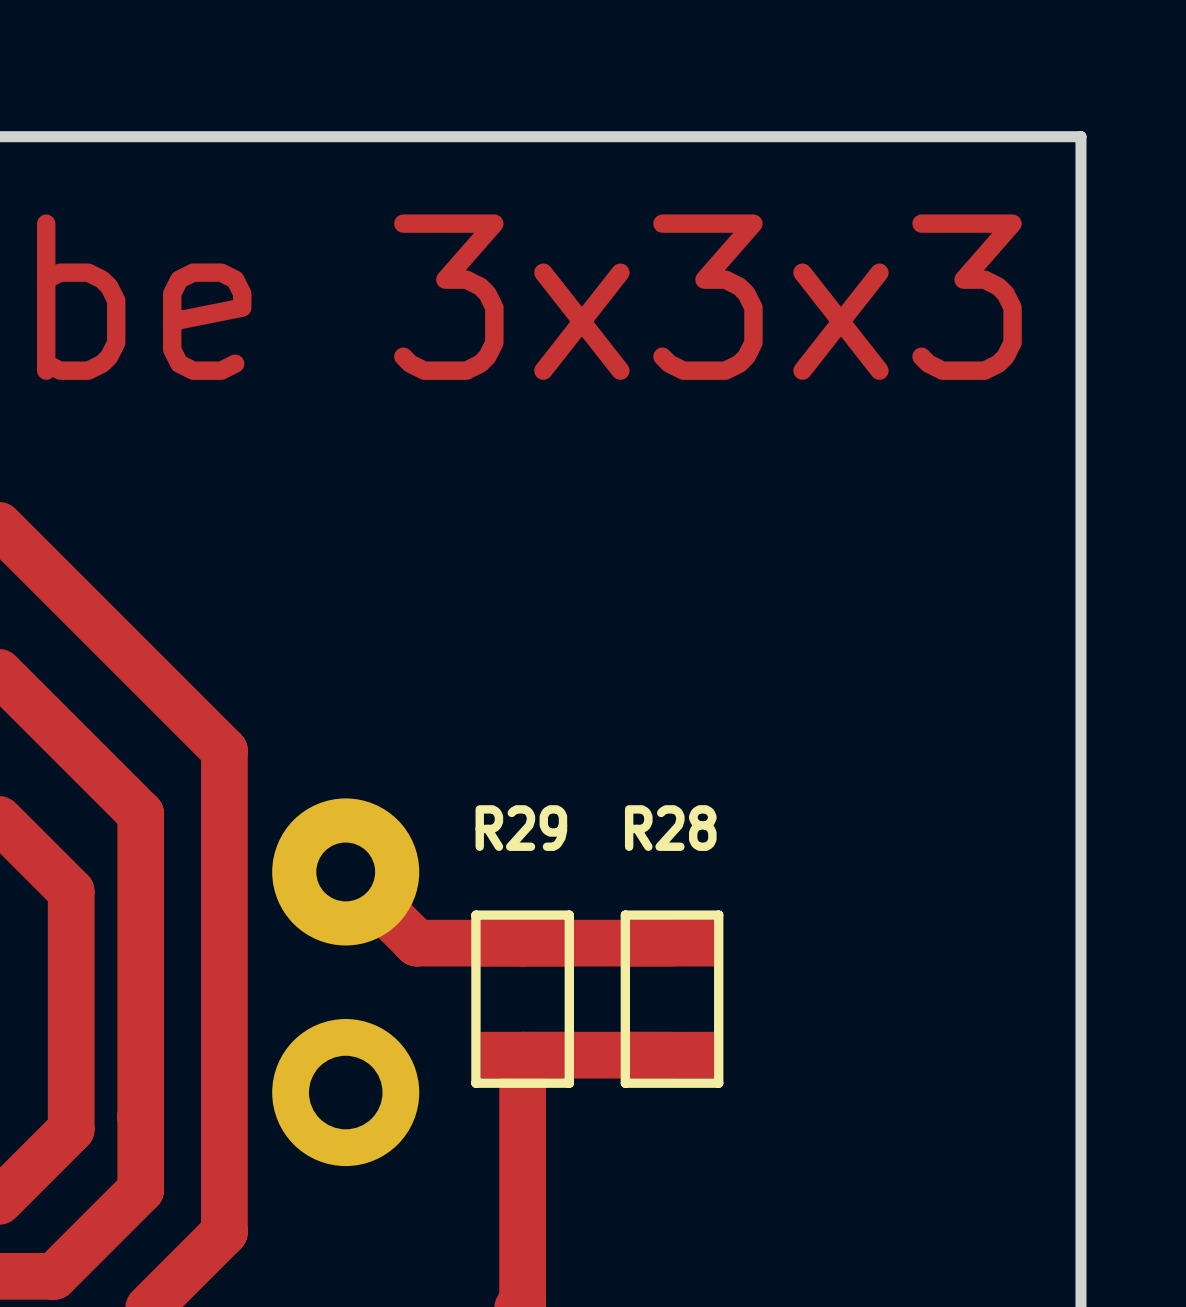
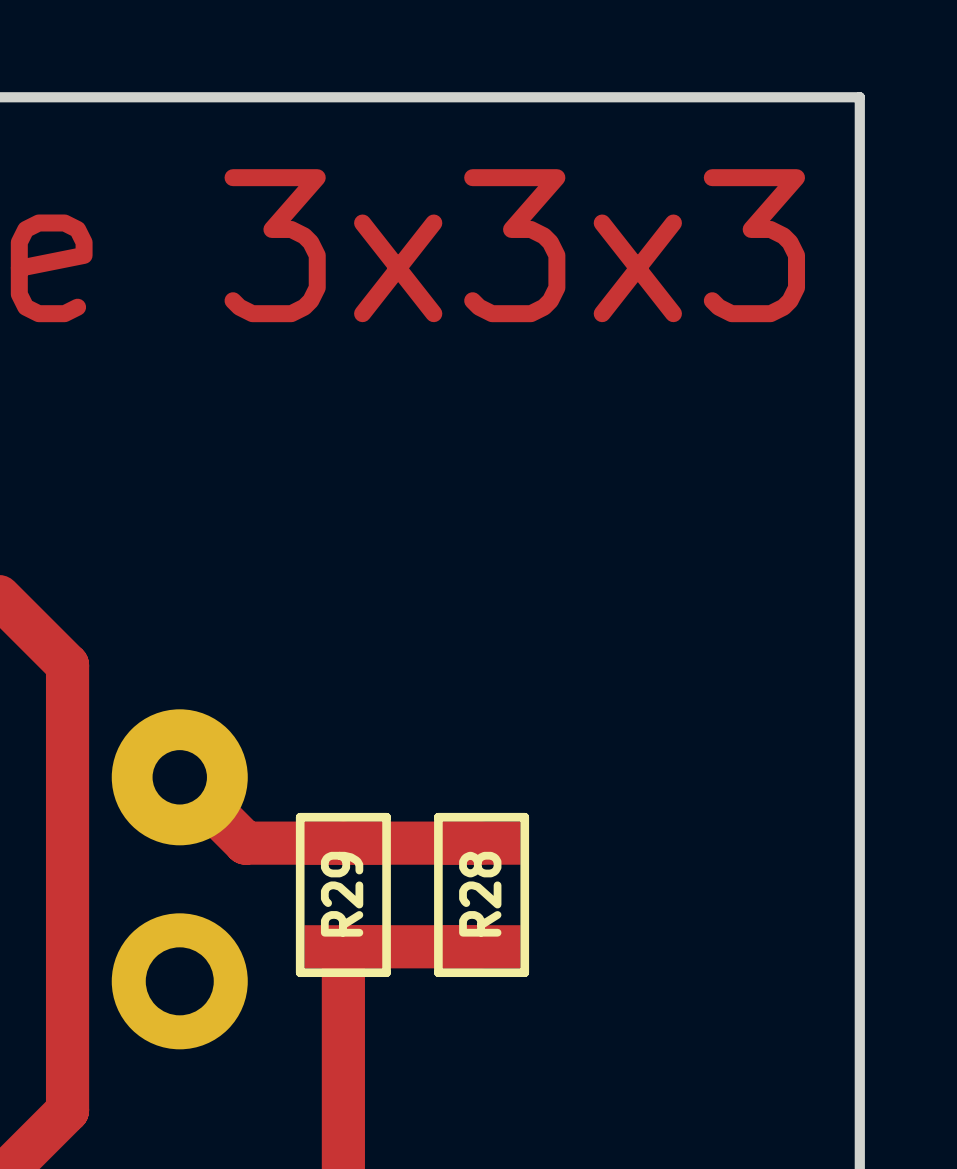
R29 name rotation: 0° (521, 828) -> 90° counterclockwise (342, 894)
R29 name position: R29 (521, 828) -> R29 (342, 894)
R28 name rotation: 0° (670, 828) -> 90° counterclockwise (480, 894)
R28 name position: R28 (670, 828) -> R28 (480, 894)

